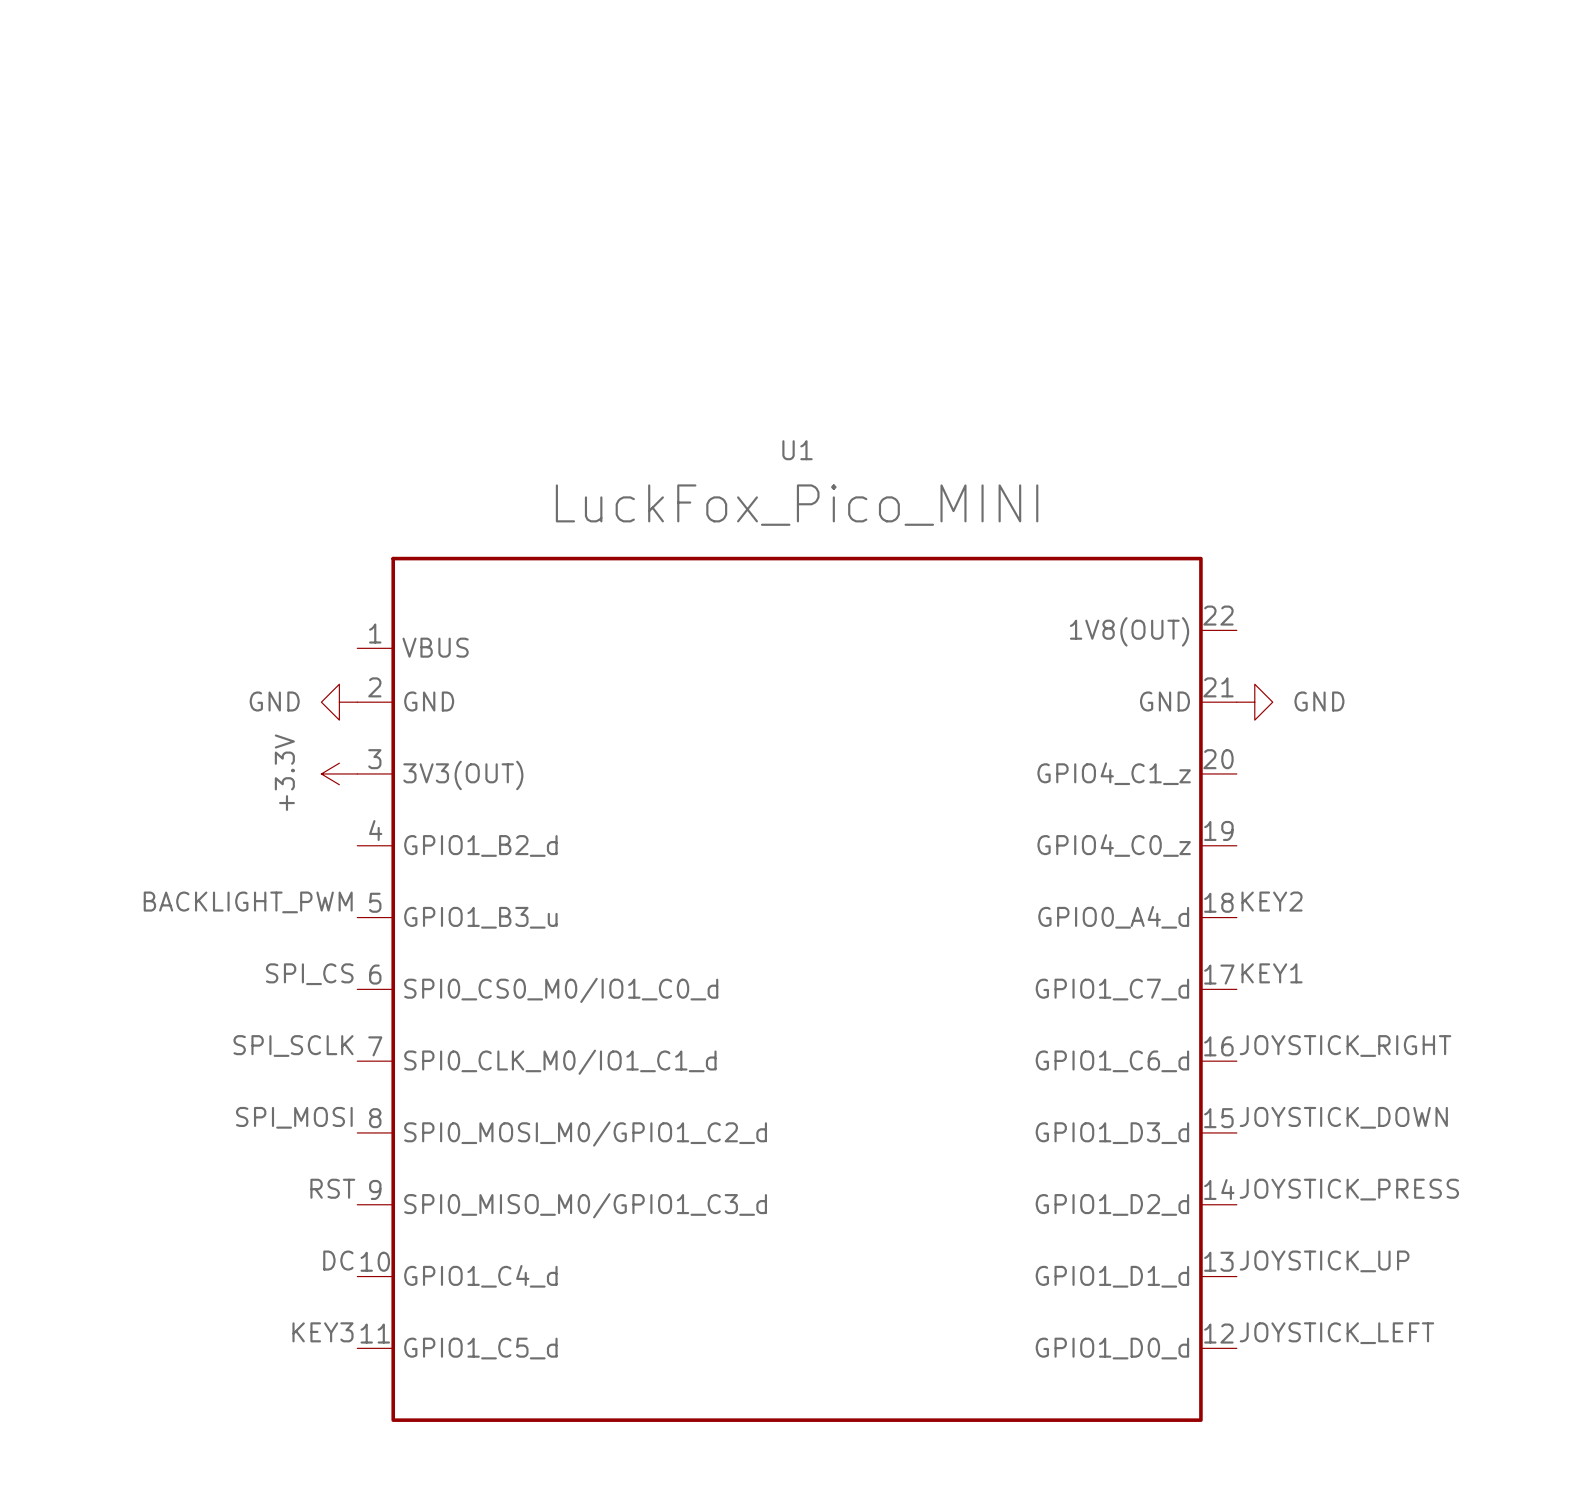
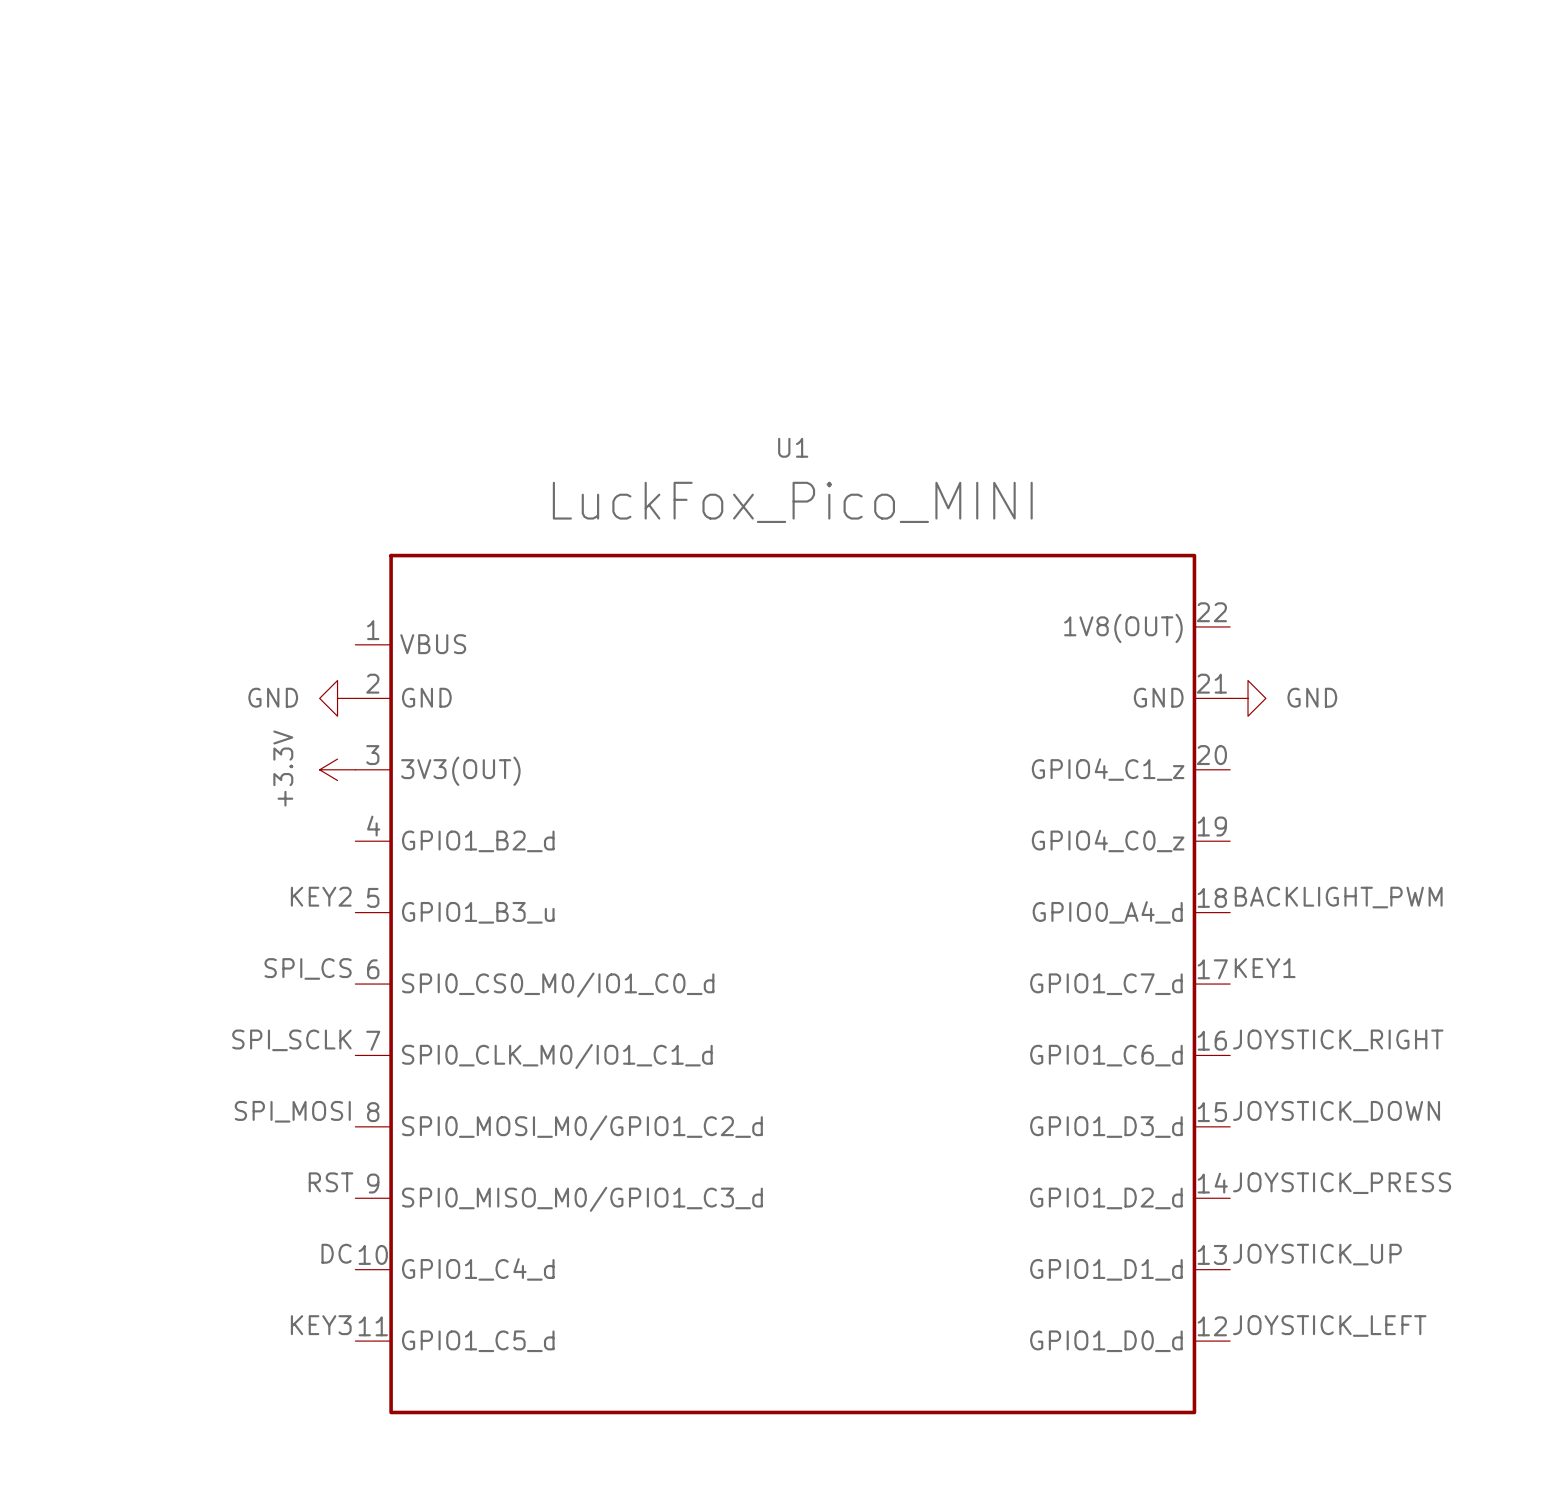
label: KEY2 (1272, 901) -> BACKLIGHT_PWM (1338, 897)
label: BACKLIGHT_PWM (248, 902) -> KEY2 (321, 896)

